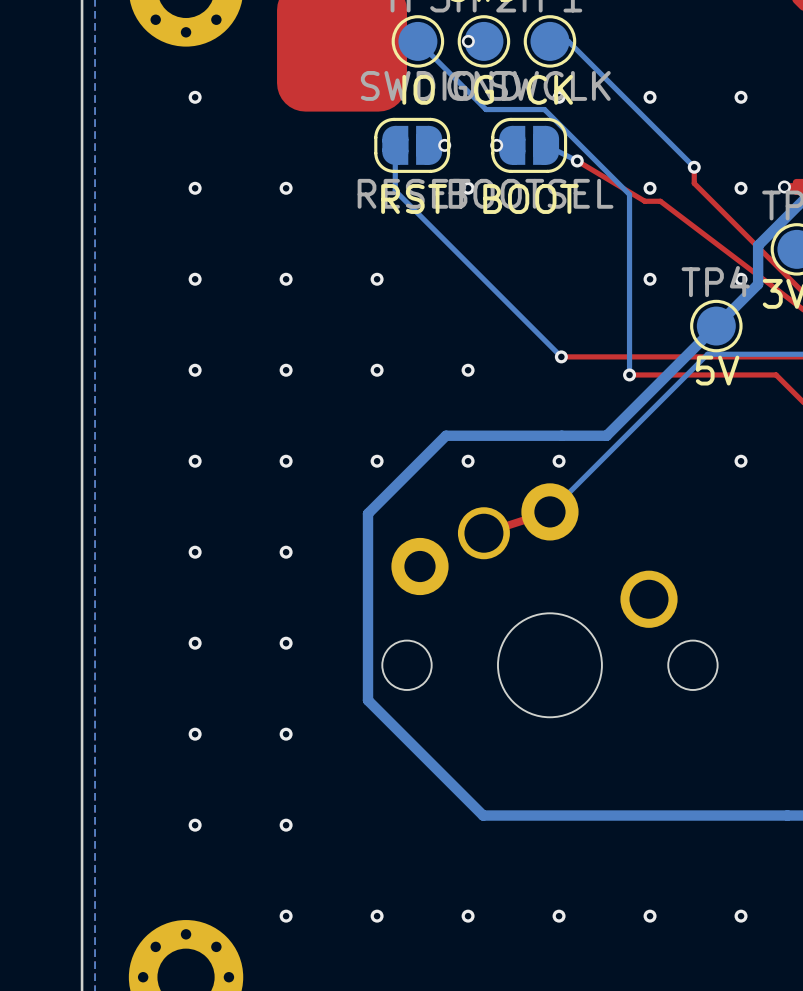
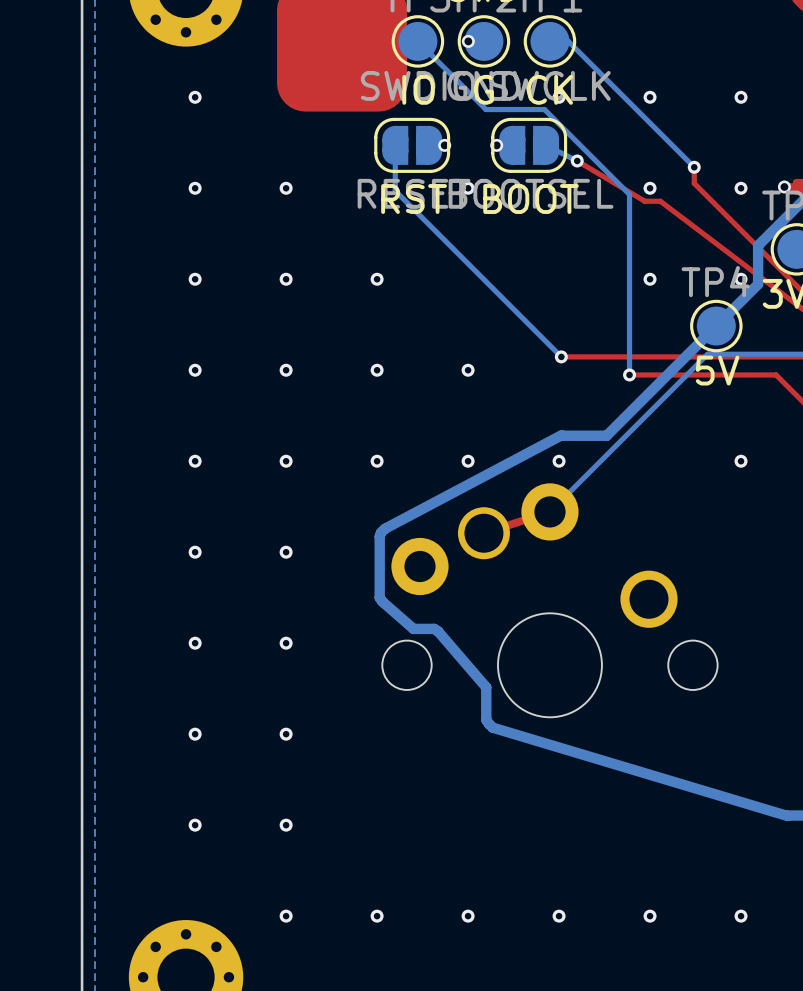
bottom track: (561, 435) (445, 435) (368, 513) (368, 700) (483, 815) (787, 815) -> (561, 435) (384, 528) (379, 536) (379, 597) (413, 628) (434, 628) (438, 631) (486, 687) (486, 719) (492, 727) (787, 816)

